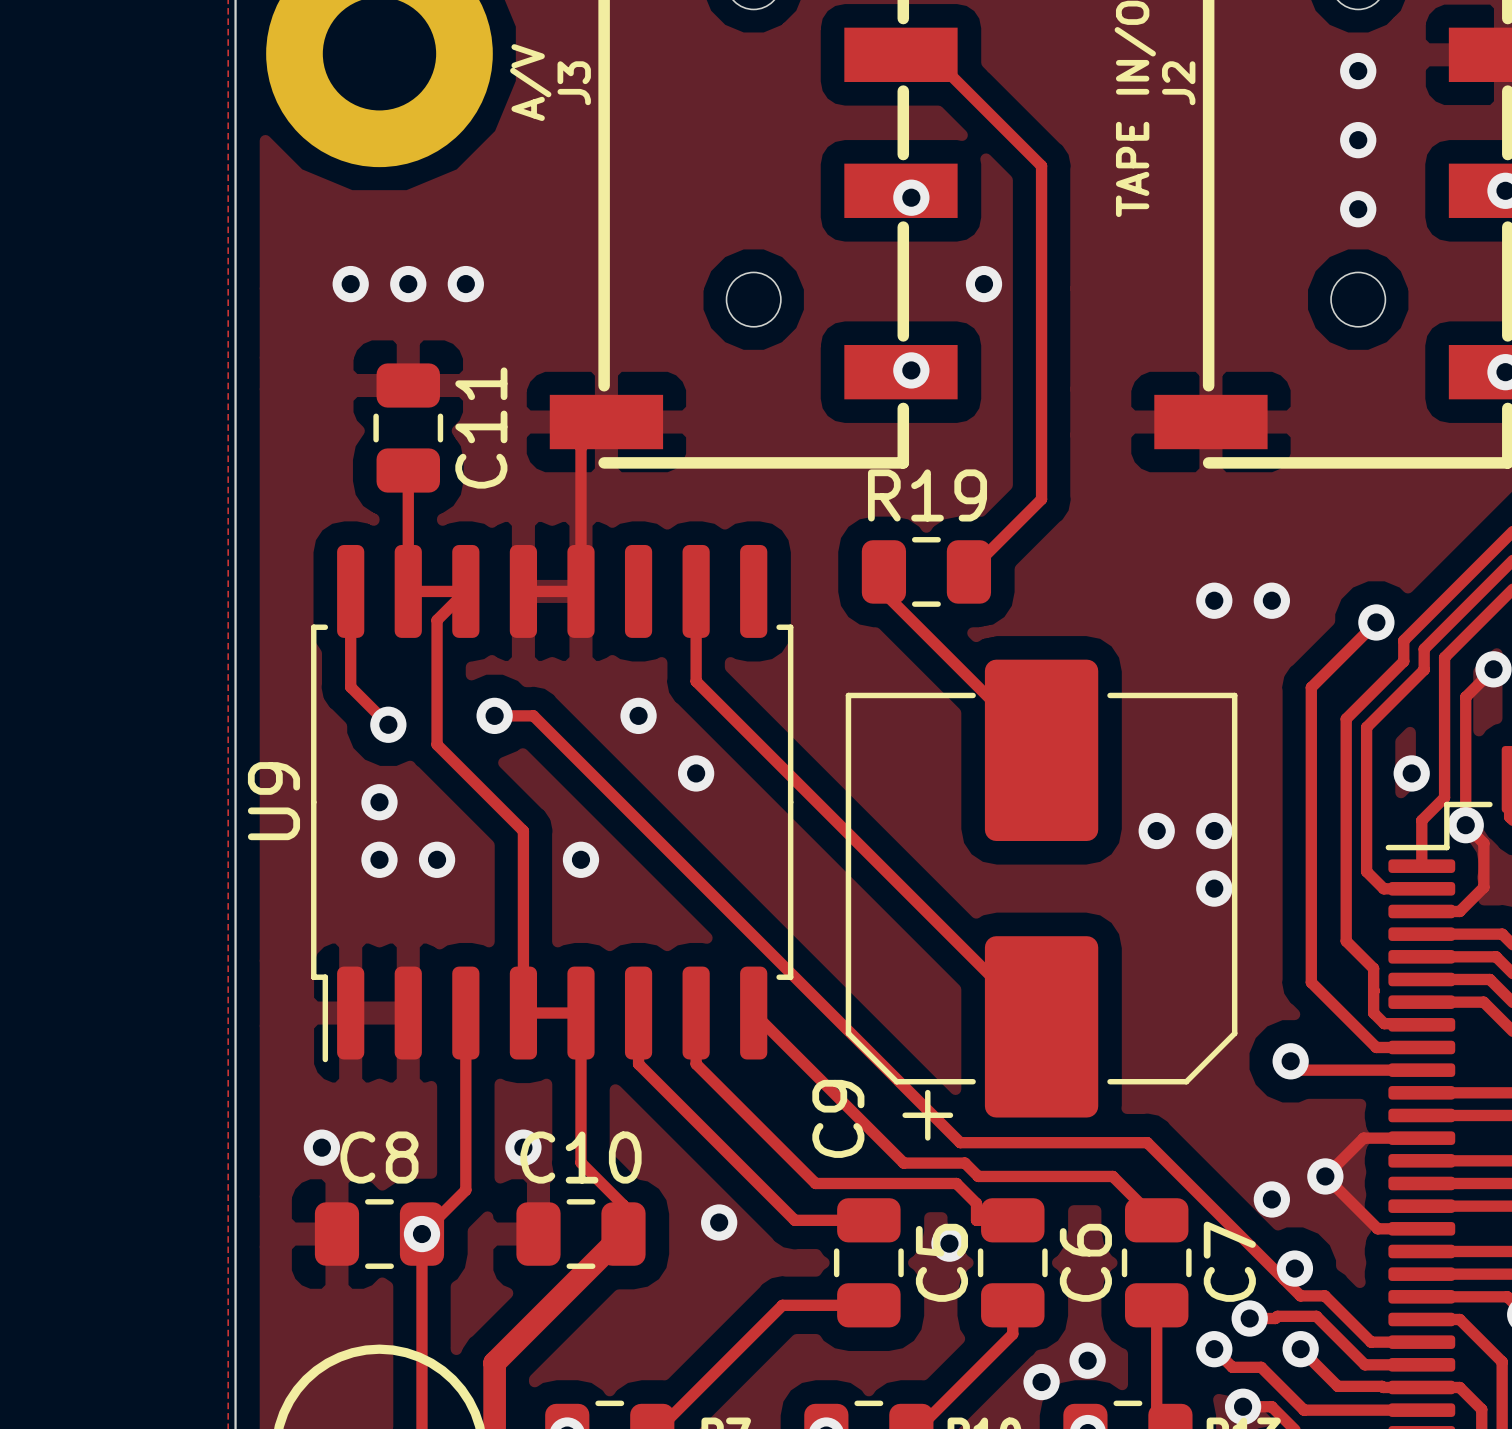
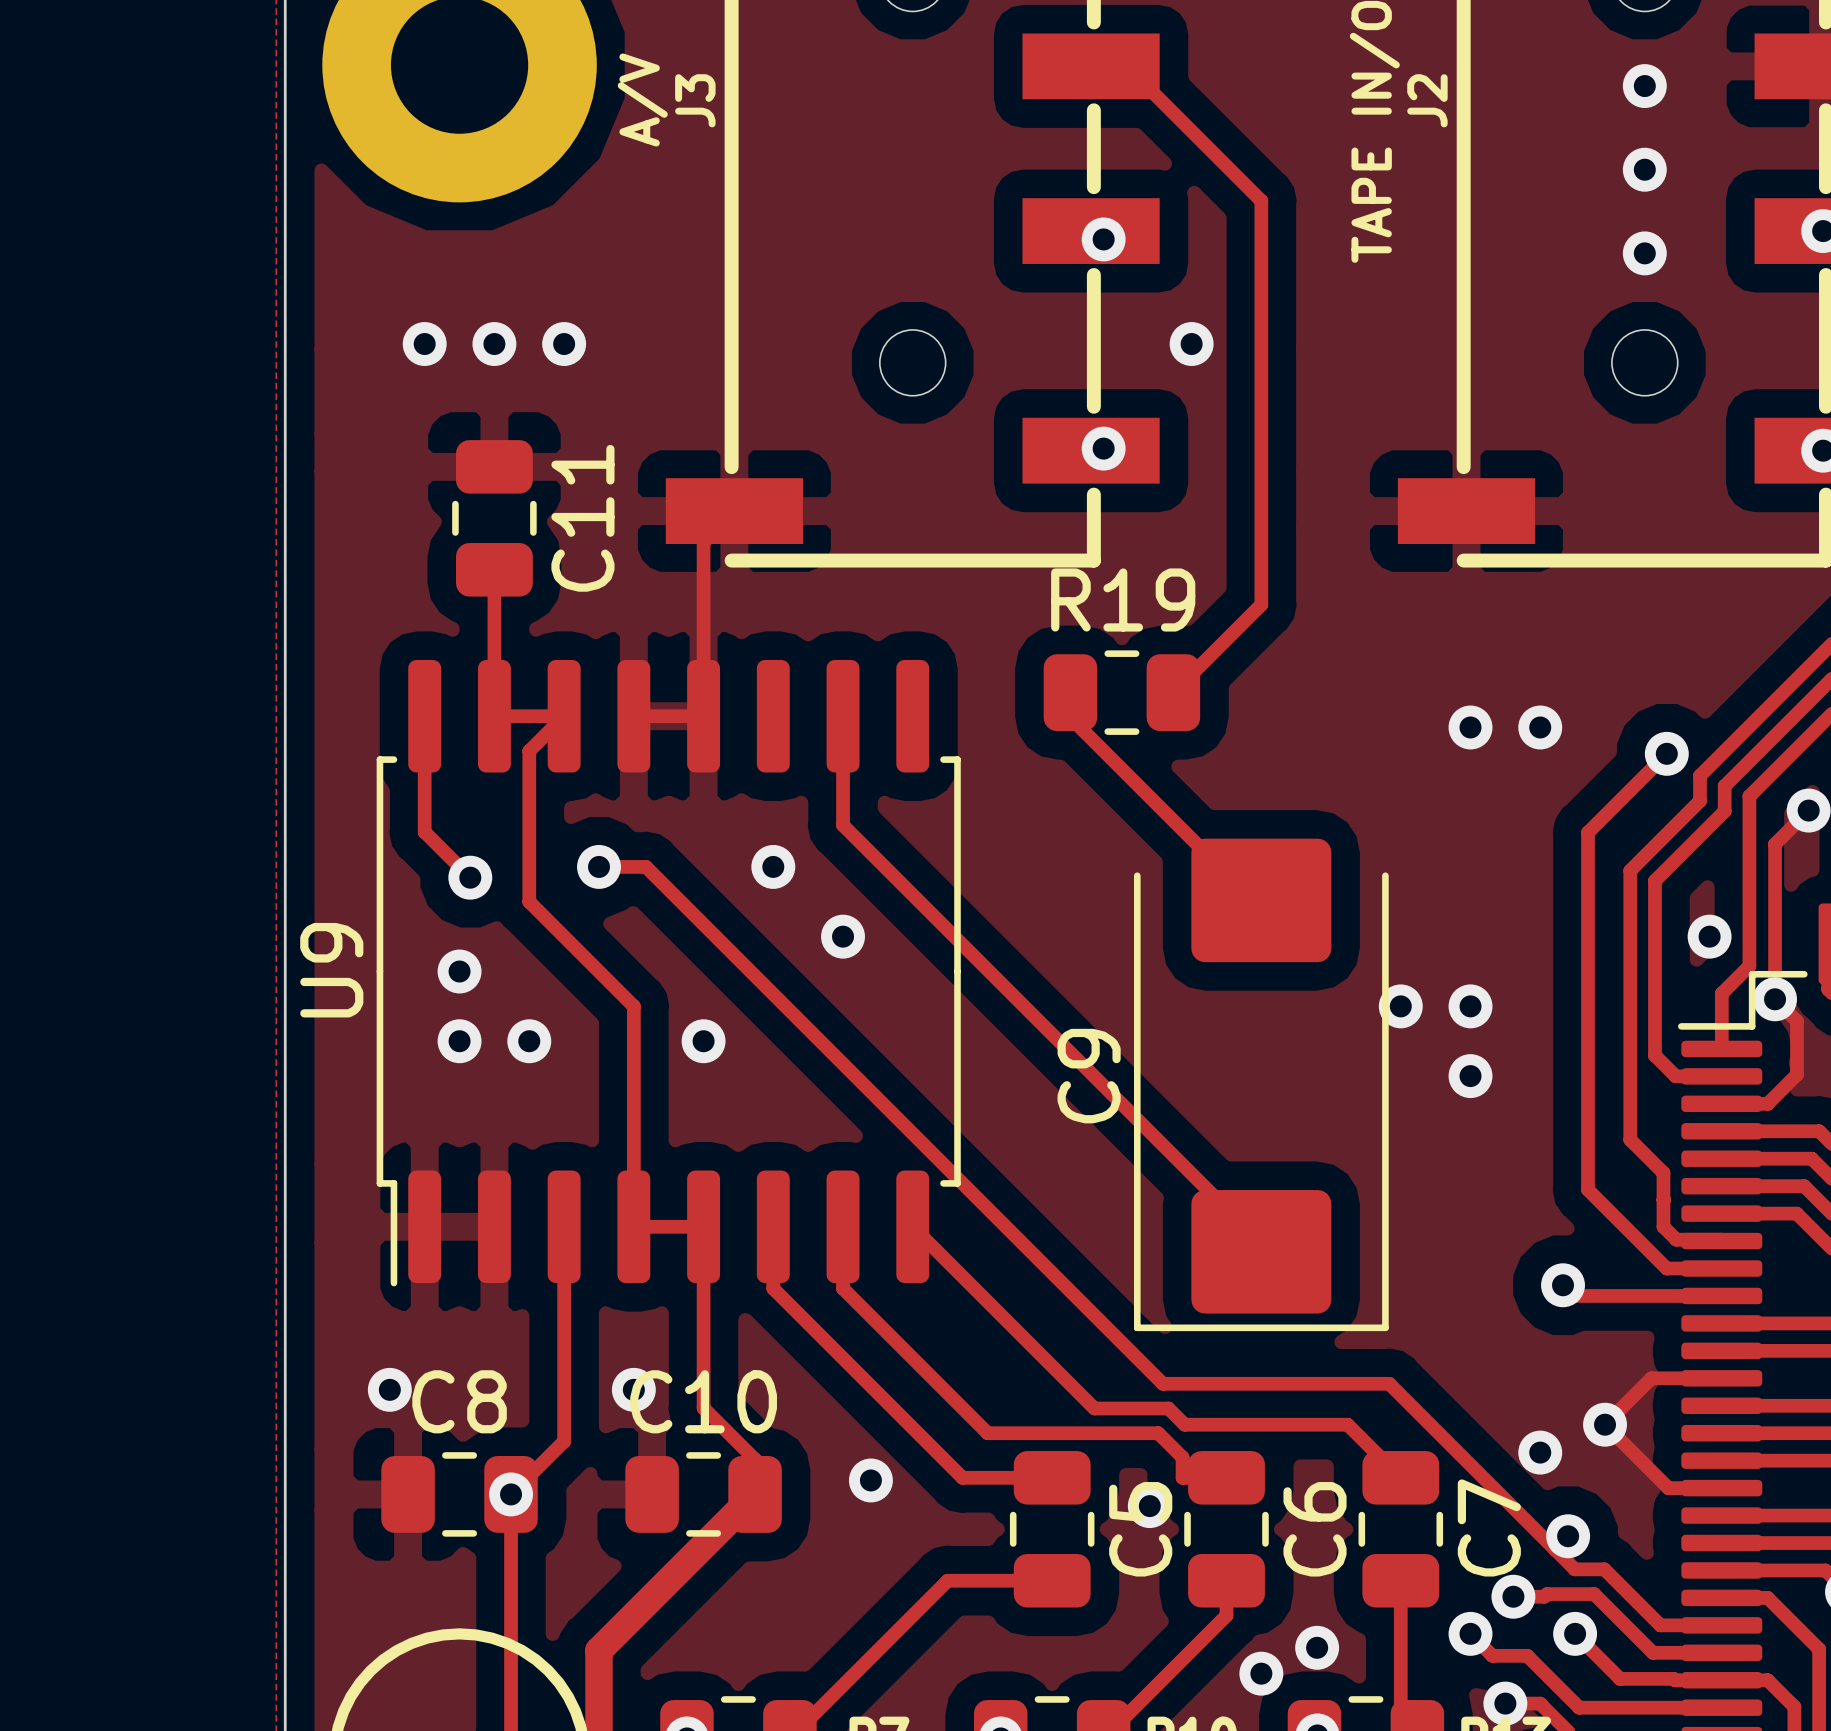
C9 footprint: [845, 659, 1238, 1141] -> [1133, 838, 1389, 1332]
C9 name position: C9 (838, 1118) -> C9 (1089, 1076)

